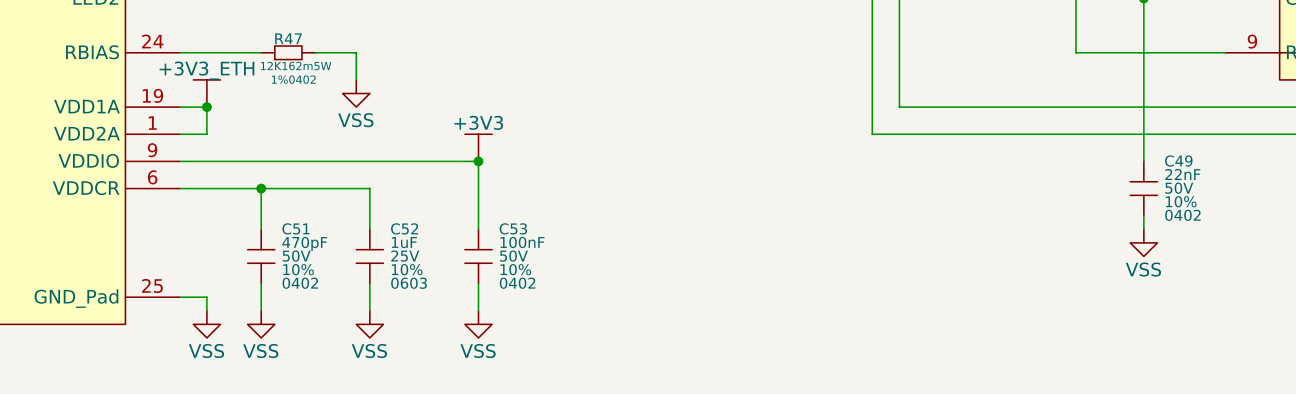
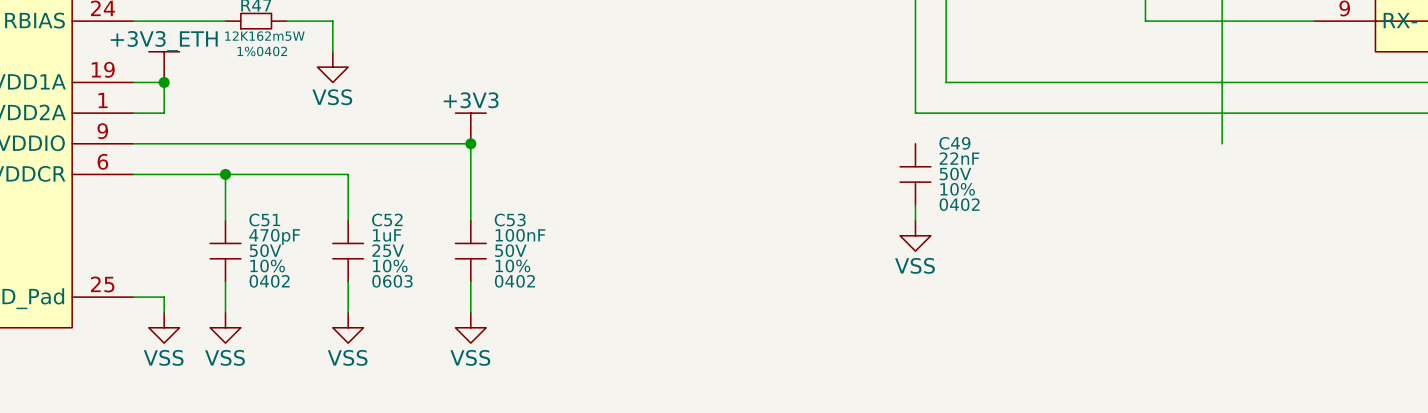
C49 position: (1143, 188) -> (915, 174)
wire: none -> (915, 205) (915, 220)
wire: (1143, 215) (1143, 229) -> none
power symbol: none -> VSS (915, 235)
power symbol: VSS (1143, 242) -> none

